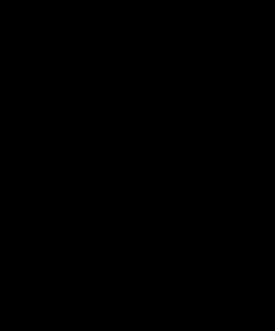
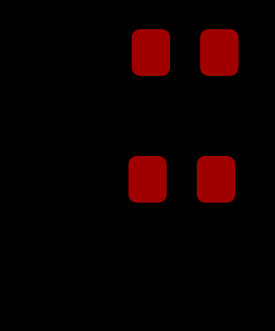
part: none -> (185, 52)
part: none -> (181, 179)

